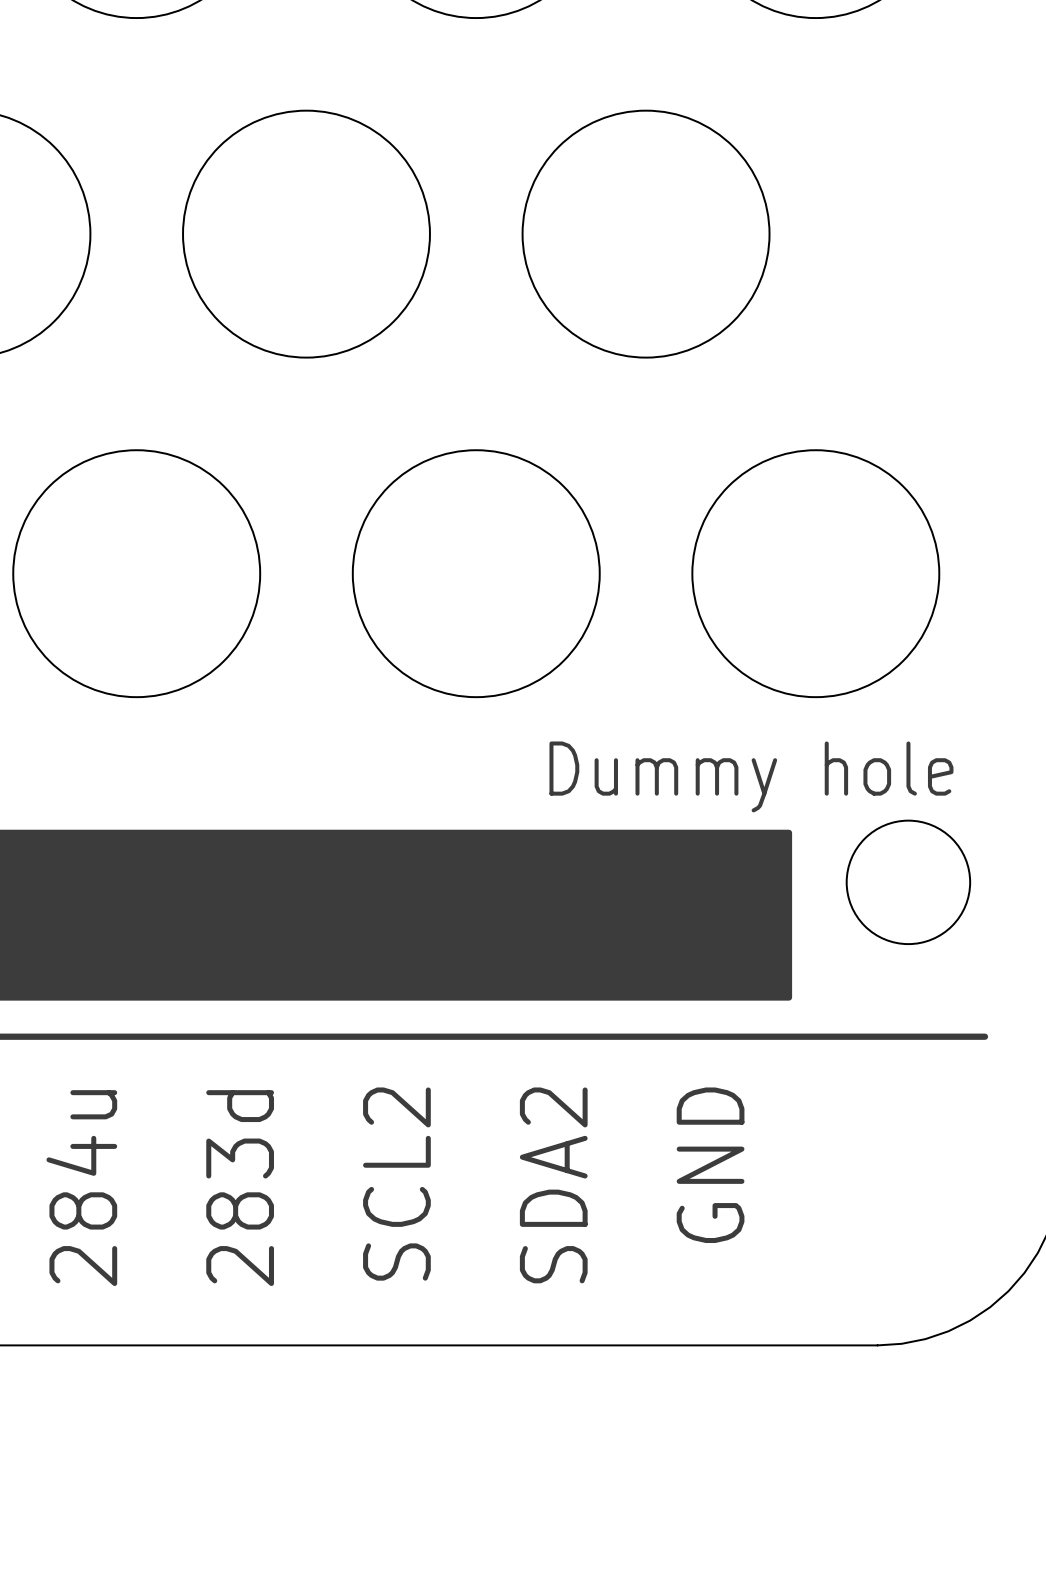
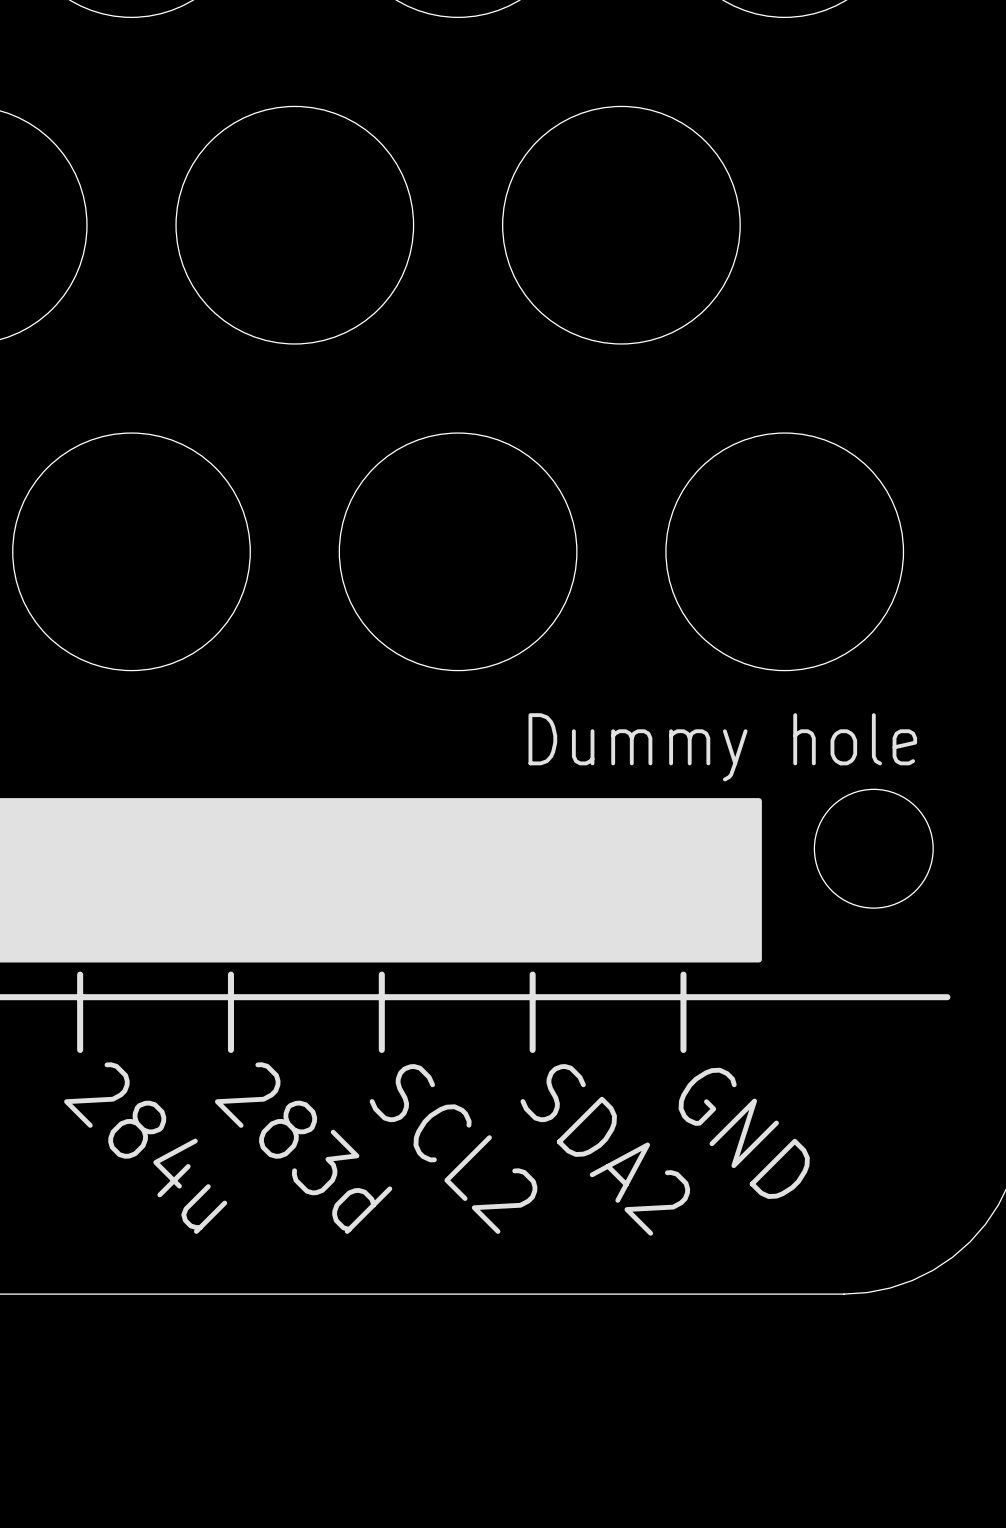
line: none -> (80, 974) (80, 1049)
line: none -> (230, 974) (230, 1049)
line: none -> (381, 974) (381, 1049)
line: none -> (532, 974) (532, 1049)
line: none -> (683, 974) (683, 1049)
text rotation: 0° (710, 1165) -> 135° clockwise (744, 1133)
text rotation: 0° (396, 1184) -> 135° clockwise (453, 1149)
text rotation: 0° (553, 1185) -> 135° clockwise (605, 1149)
text rotation: 0° (81, 1188) -> 135° clockwise (145, 1148)
text rotation: 0° (240, 1188) -> 135° clockwise (303, 1148)

